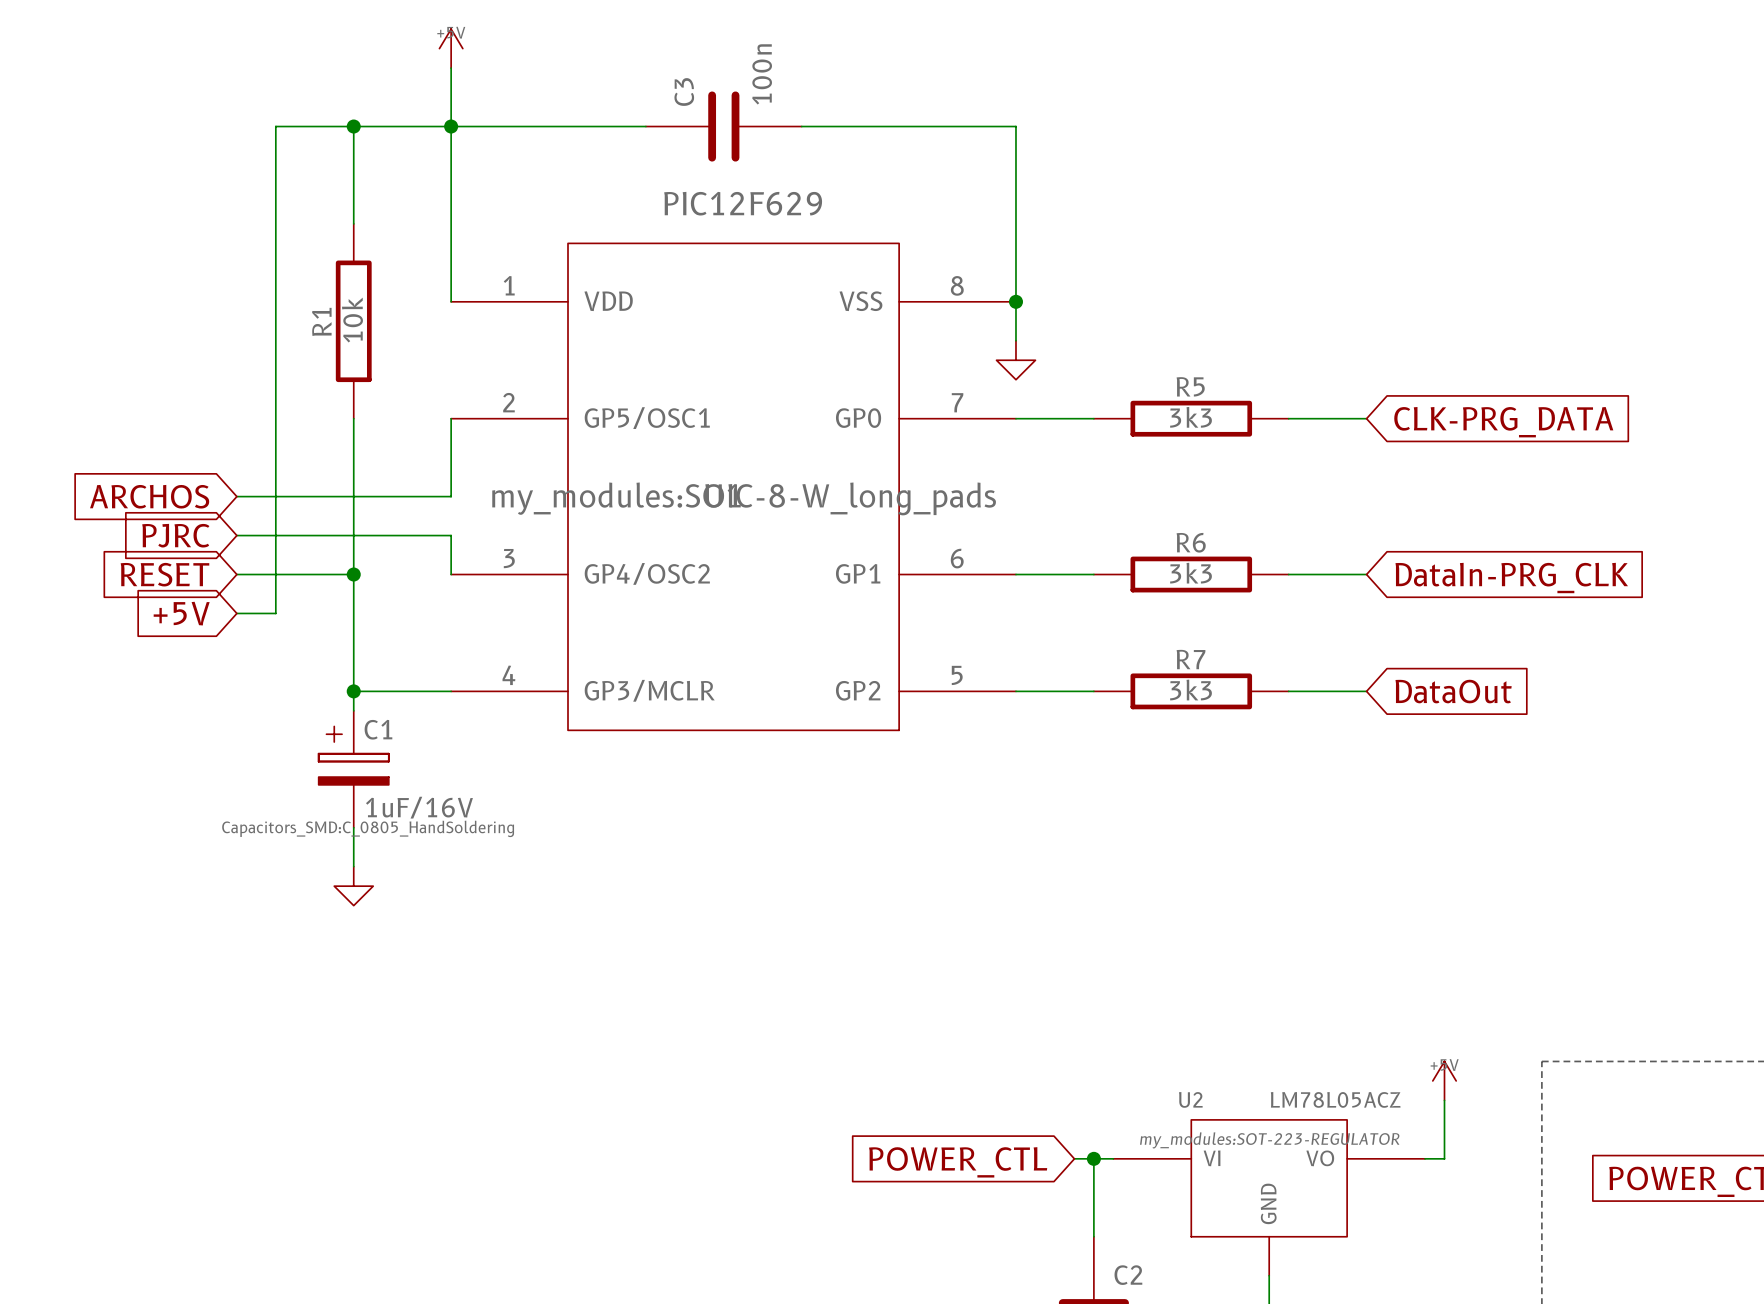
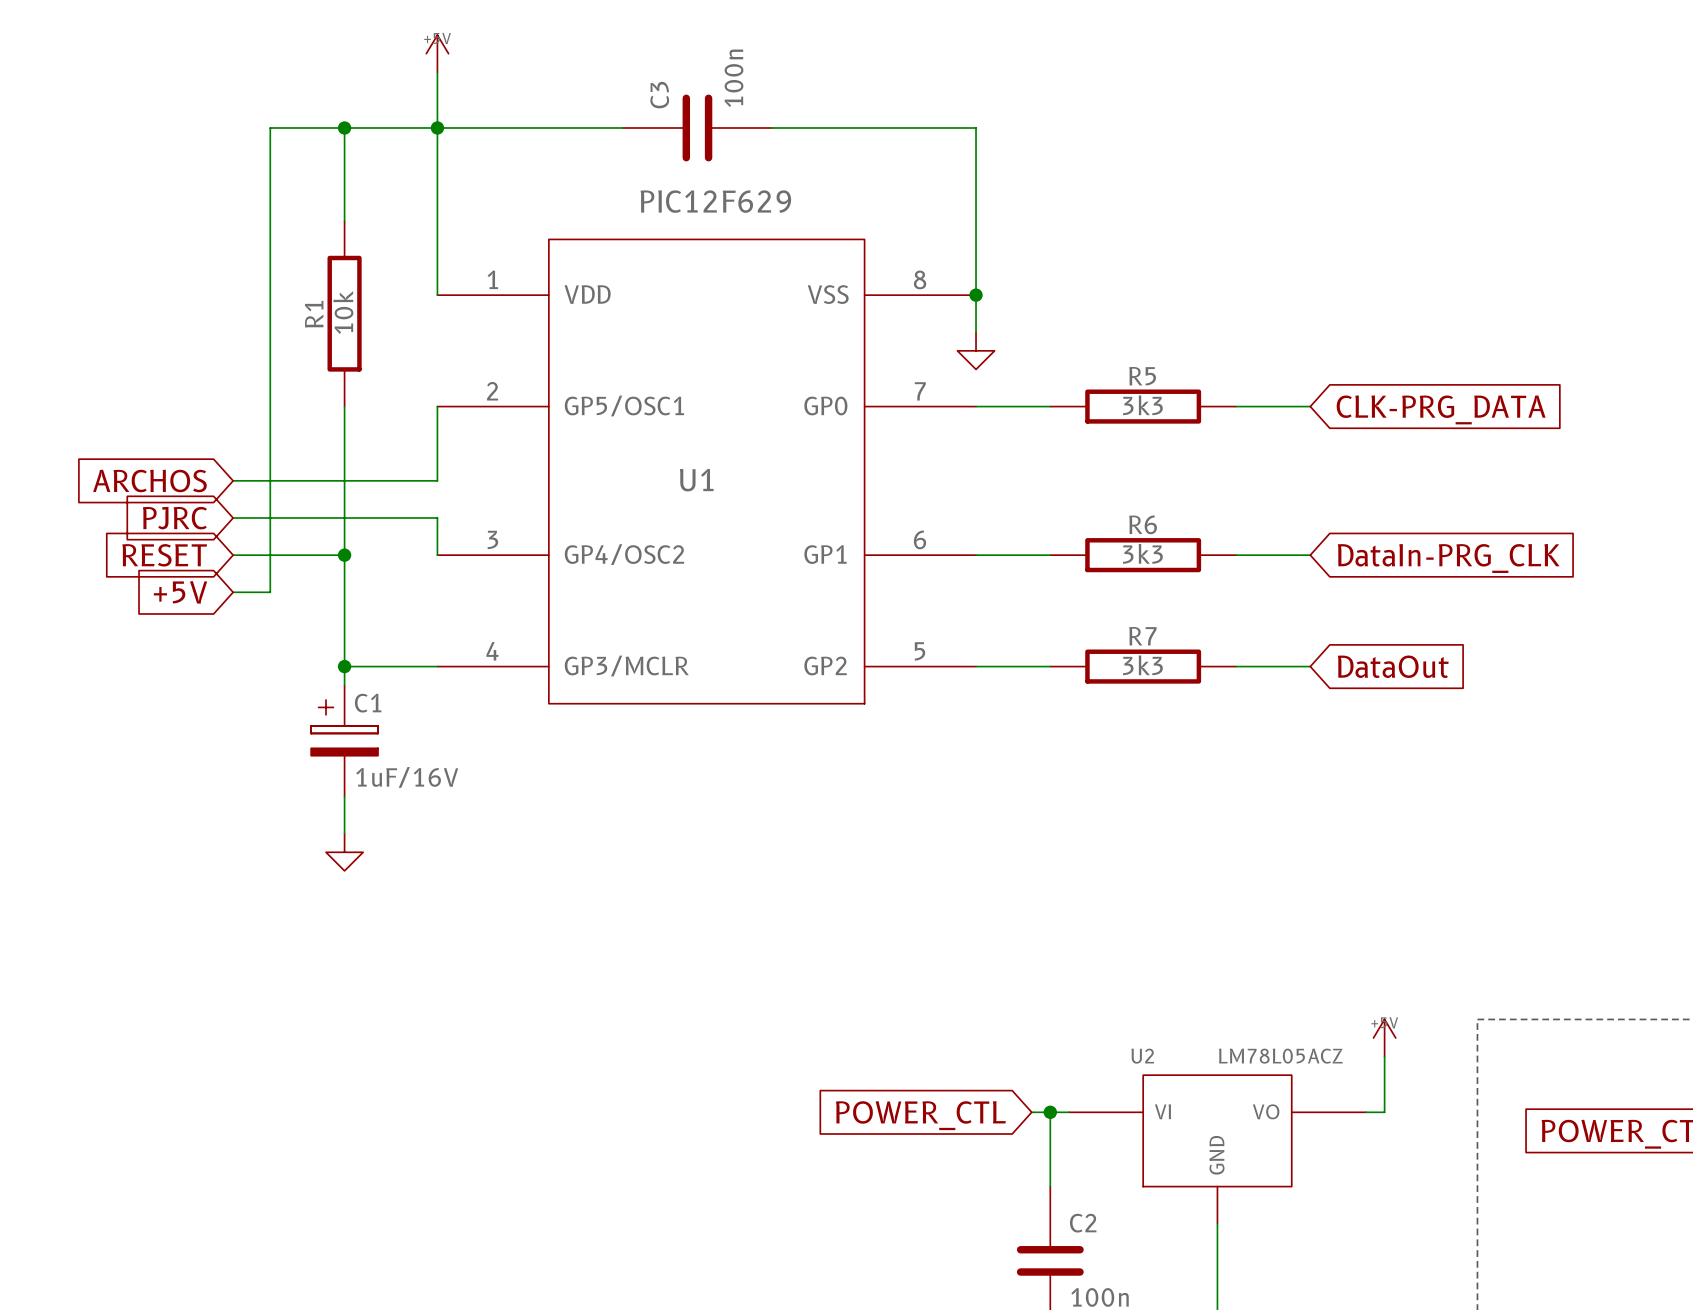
U1 text: my_modules:SOIC-8-W_long_pads (744, 498) -> none
C1 text: Capacitors_SMD:C_0805_HandSoldering (368, 828) -> none
U2 text: my_modules:SOT-223-REGULATOR (1269, 1140) -> none

